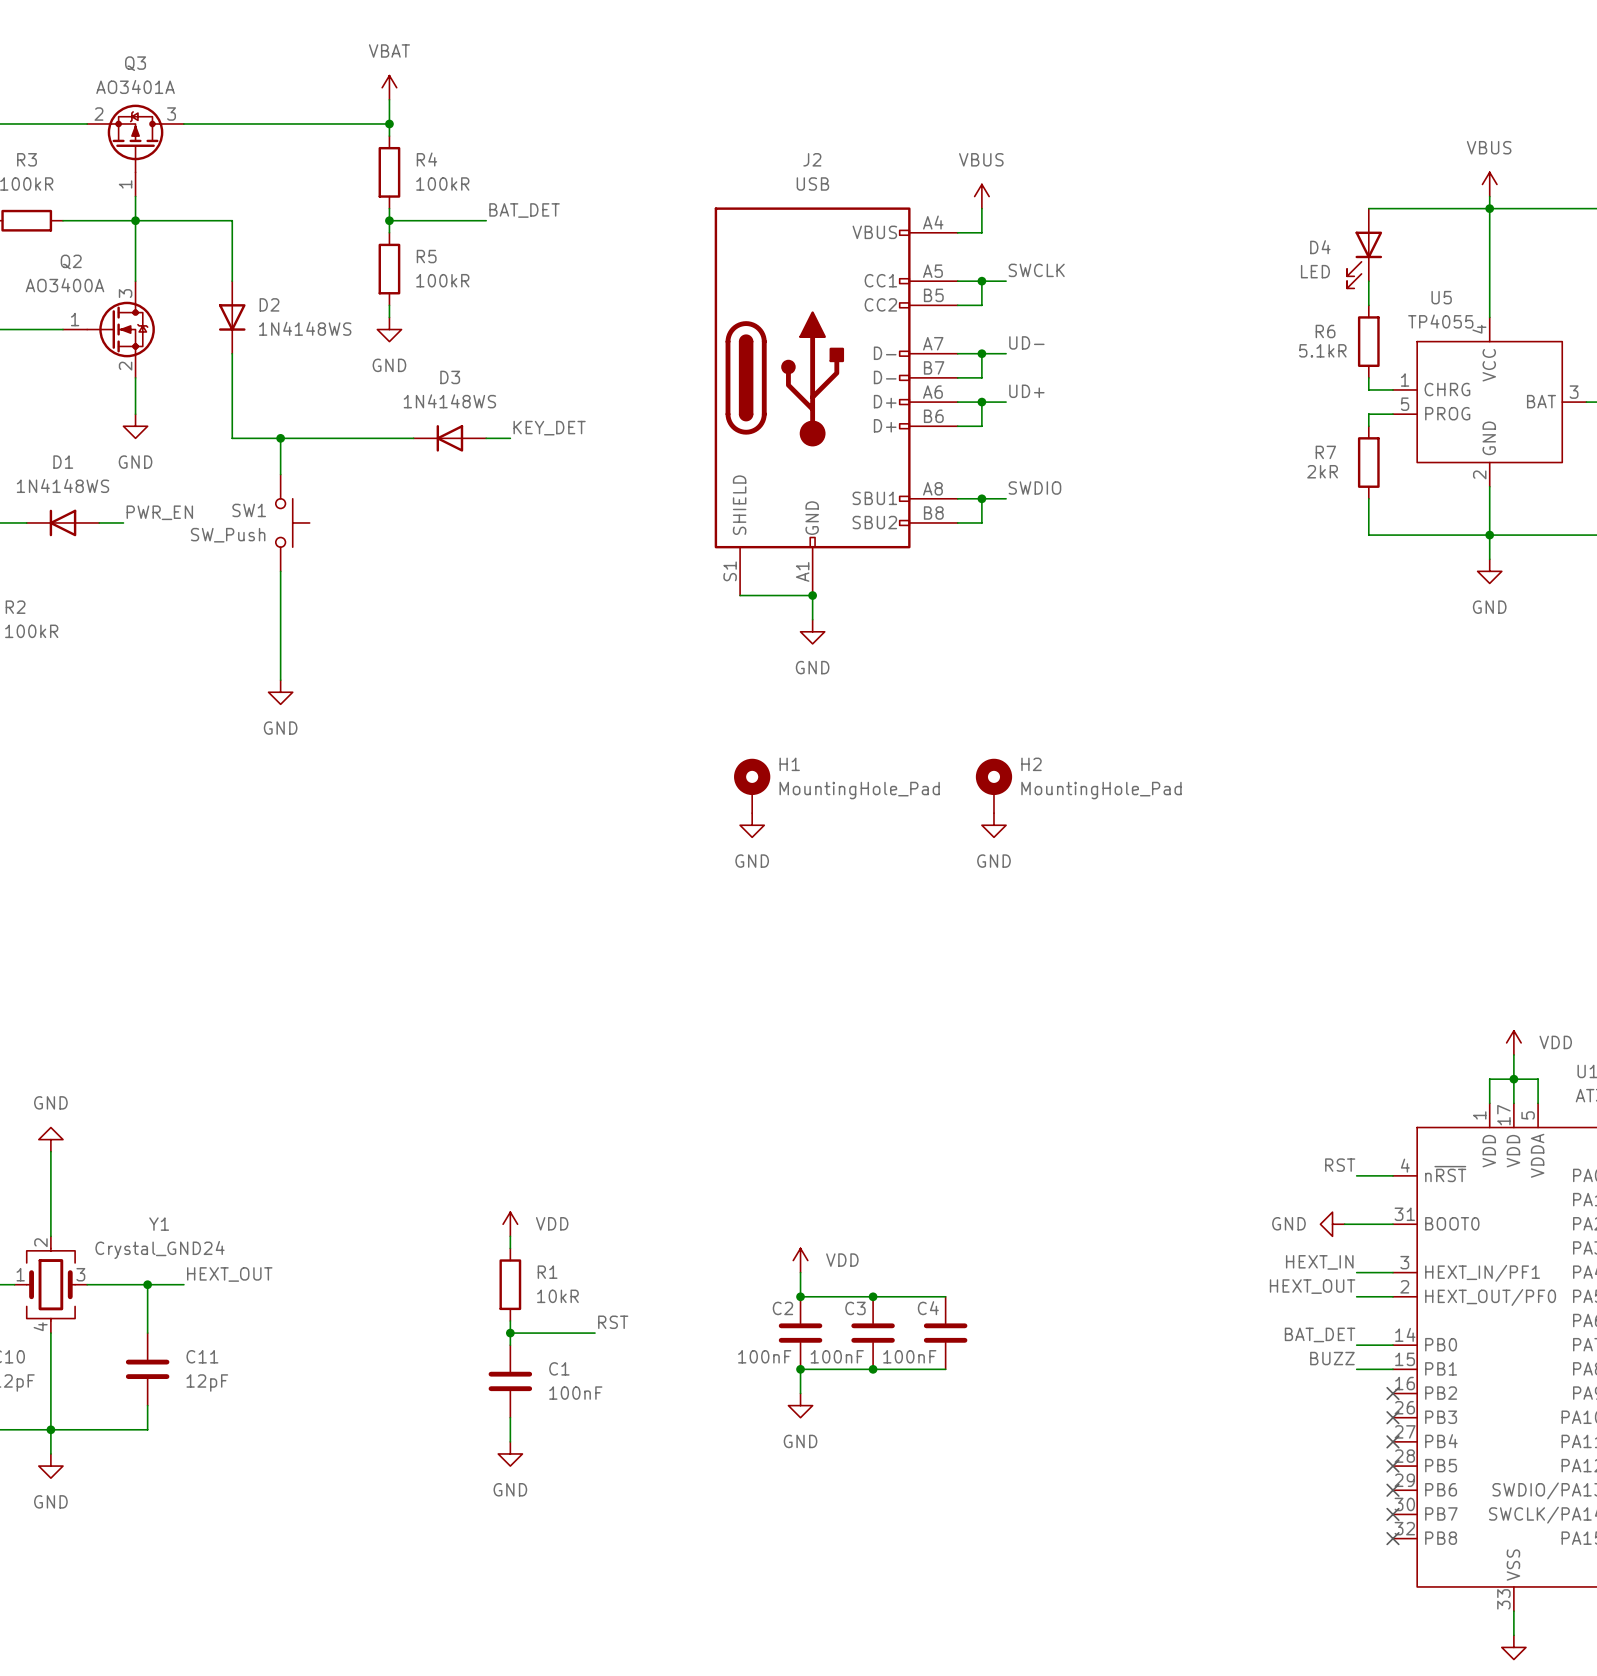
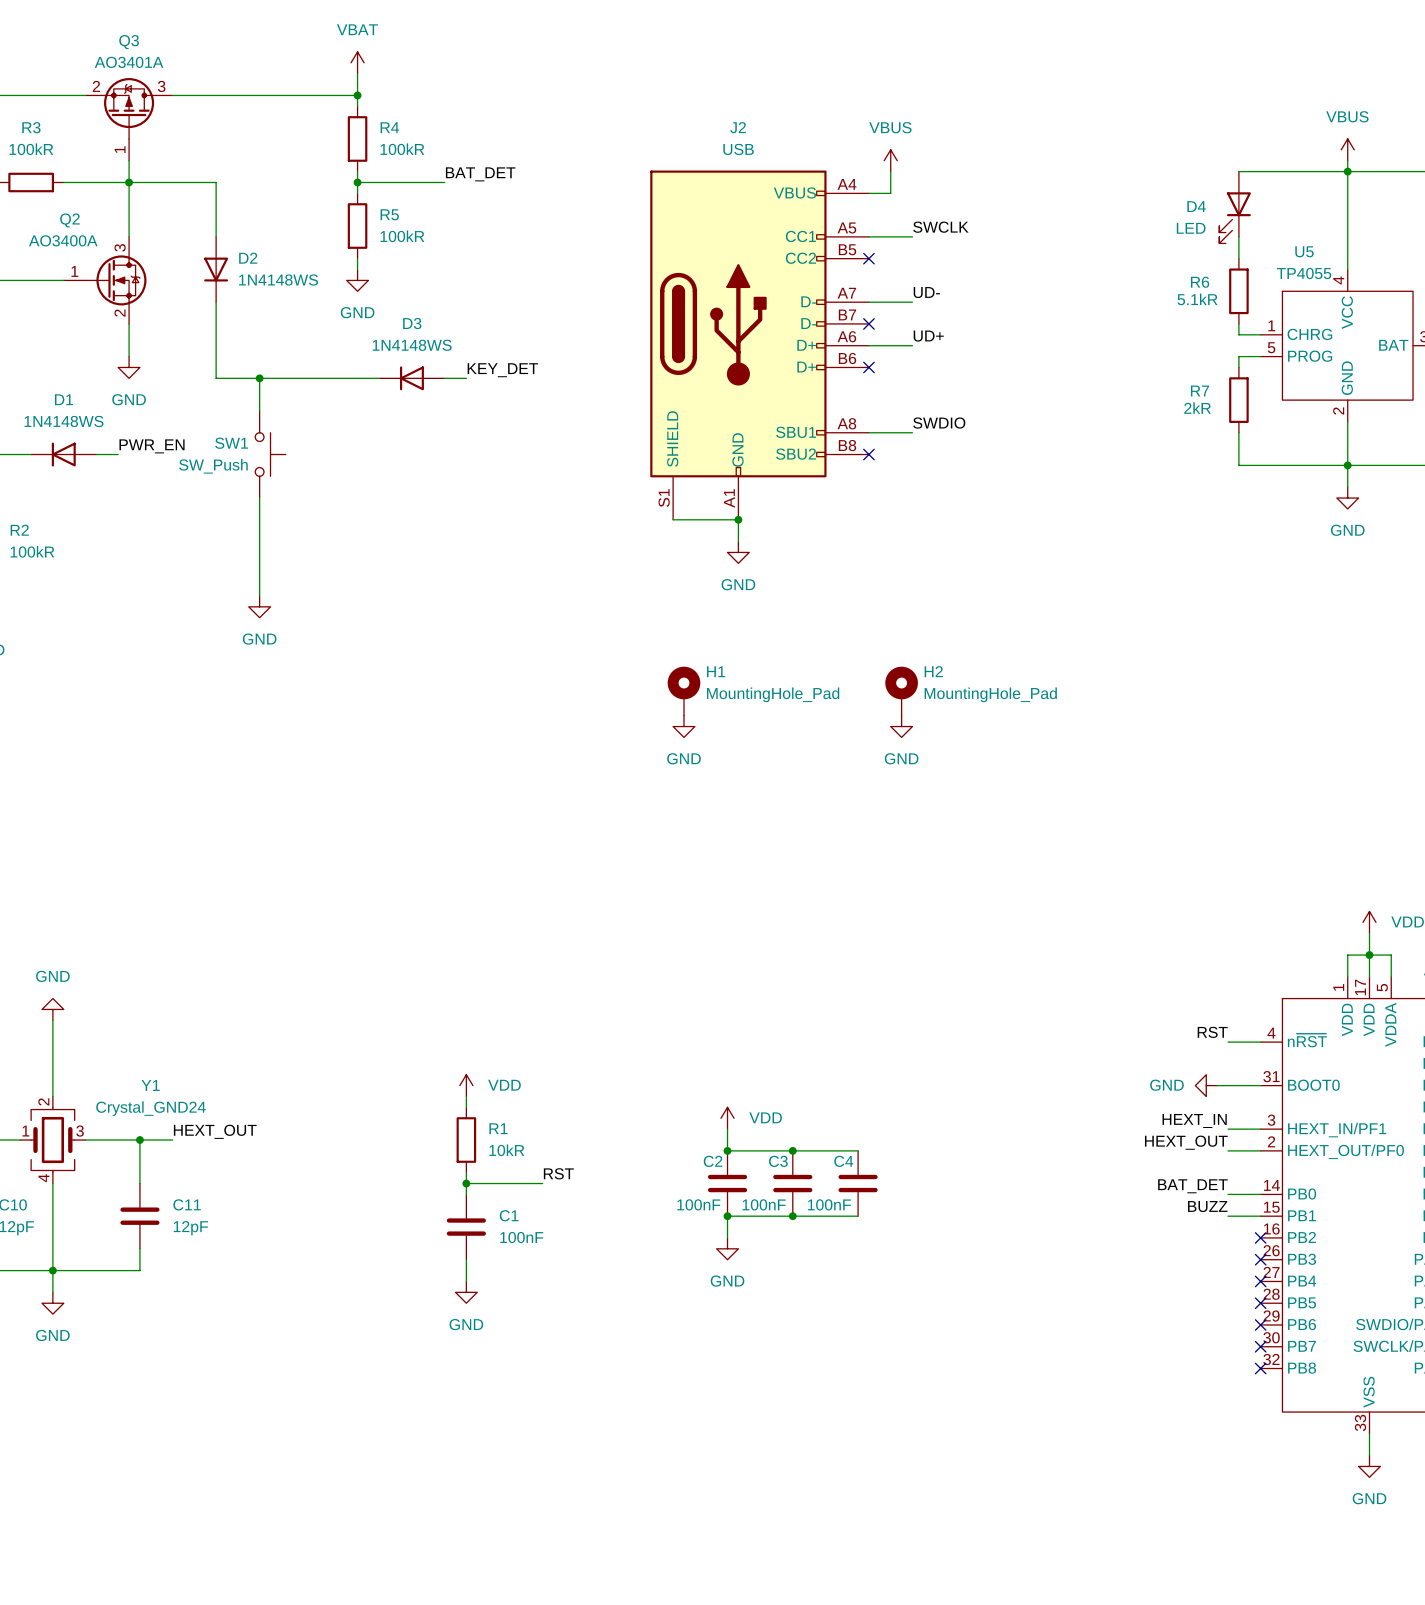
wire: (981, 281) (981, 305) (957, 305) -> none
junction: (981, 281) -> none
no-connect mark: none -> (868, 258)
wire: (981, 353) (981, 377) (957, 377) -> none
junction: (981, 353) -> none
no-connect mark: none -> (868, 323)
wire: (981, 402) (981, 426) (957, 426) -> none
junction: (981, 402) -> none
no-connect mark: none -> (868, 367)
wire: (981, 498) (981, 522) (957, 522) -> none
junction: (981, 498) -> none
no-connect mark: none -> (868, 454)

